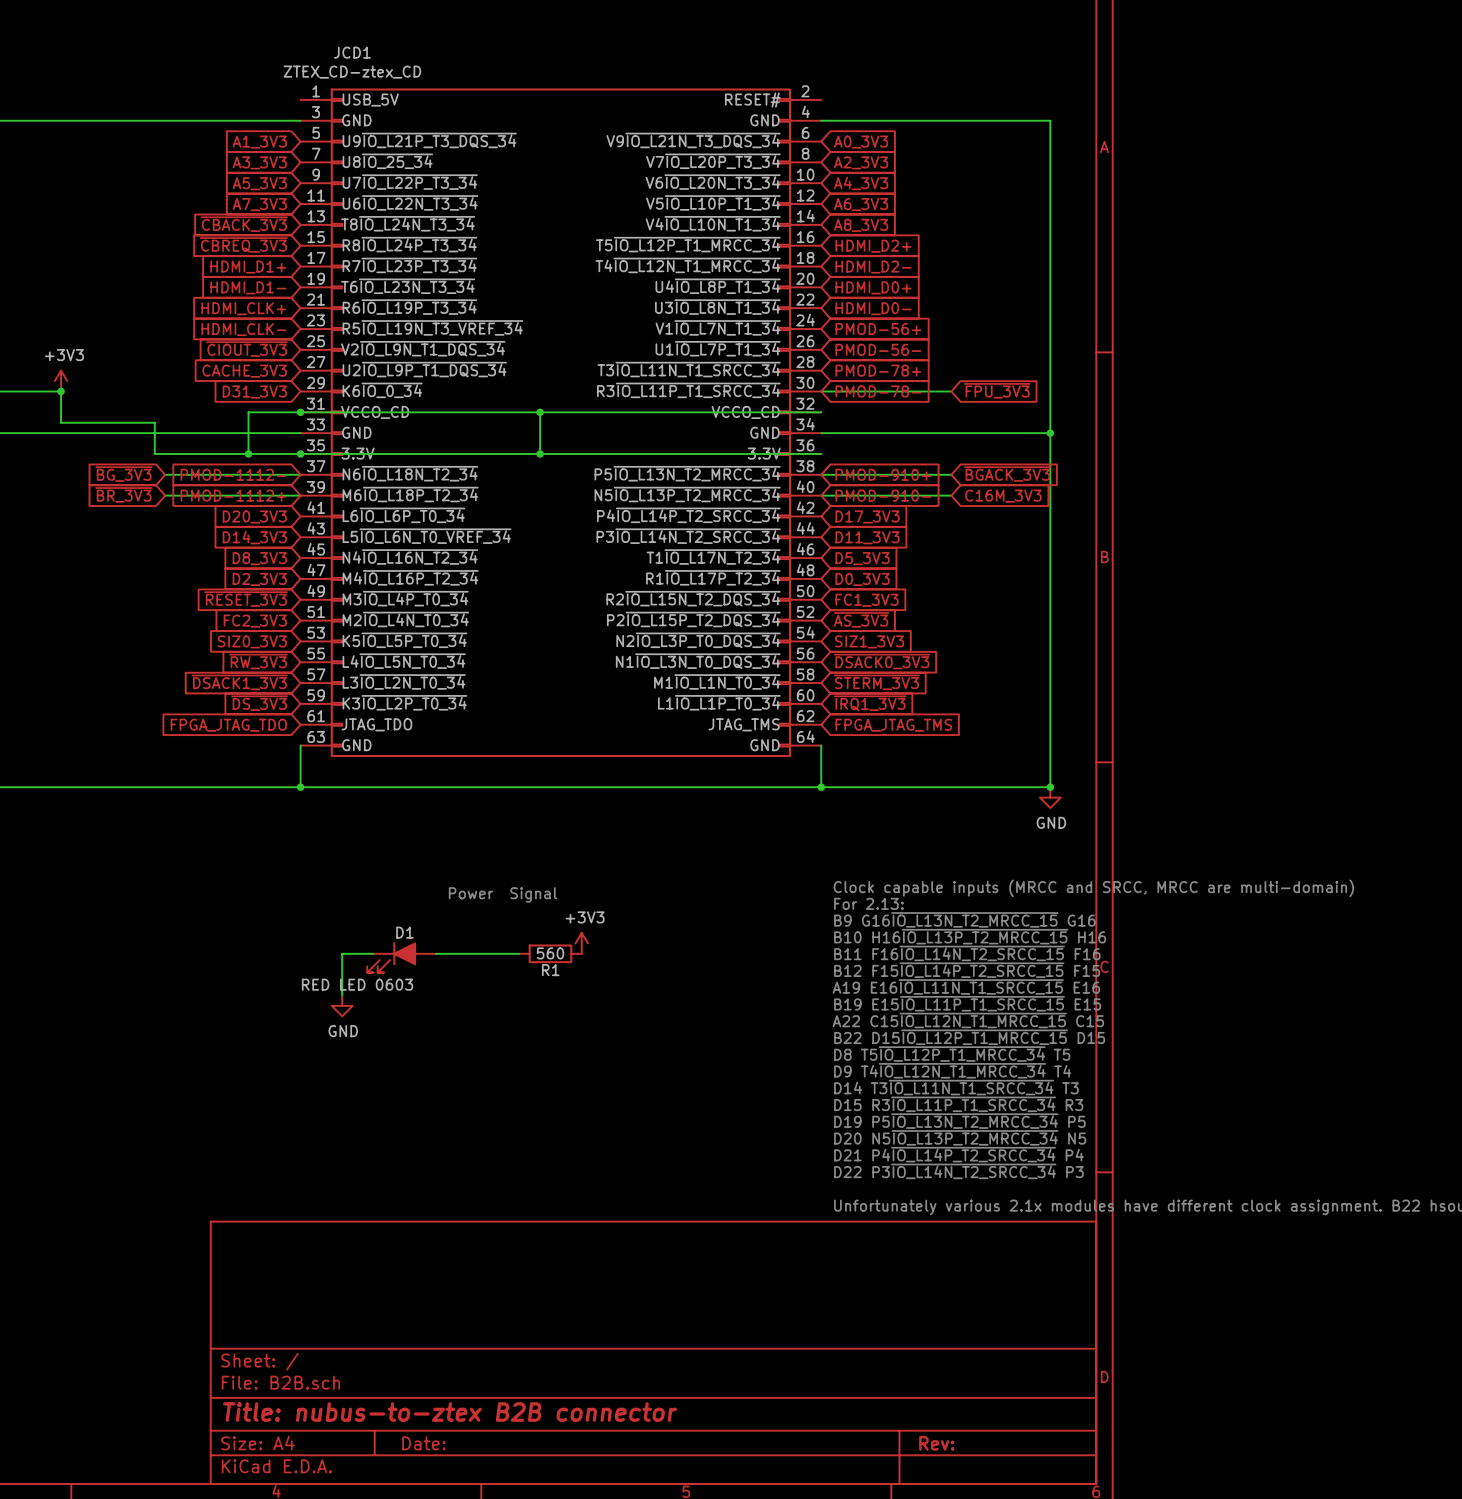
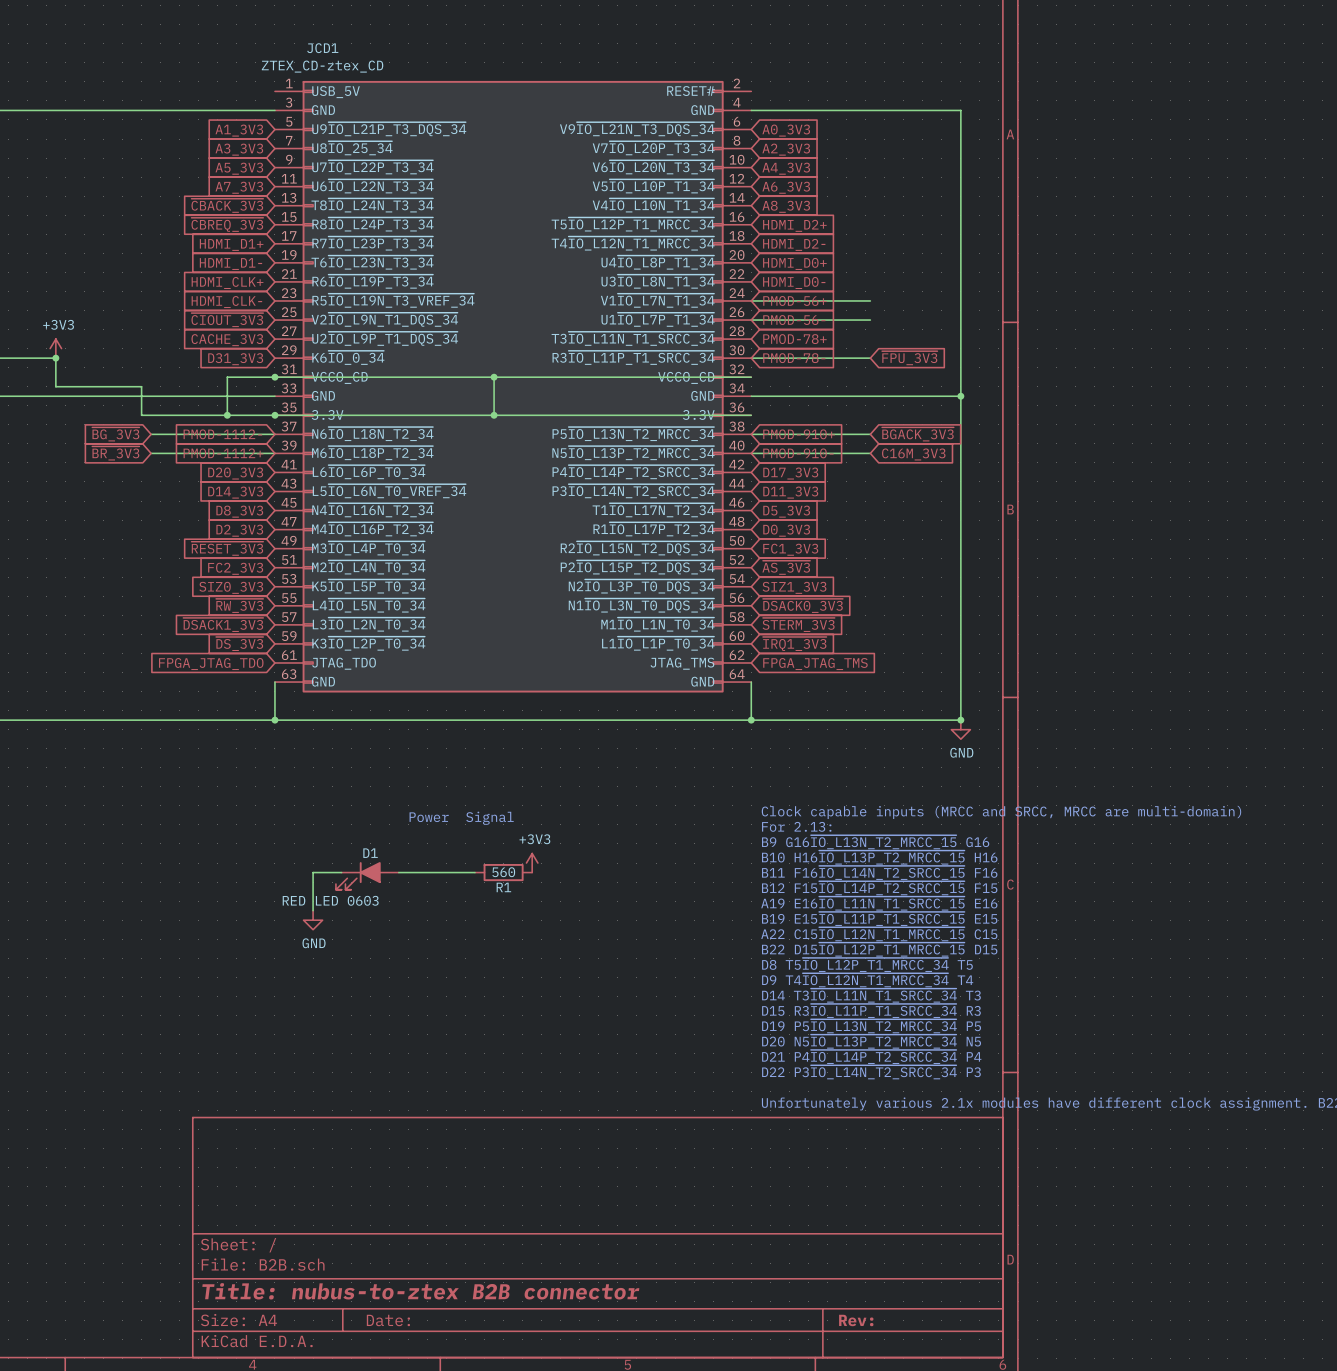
wire: none -> (751, 300) (870, 300)
wire: none -> (751, 320) (870, 320)

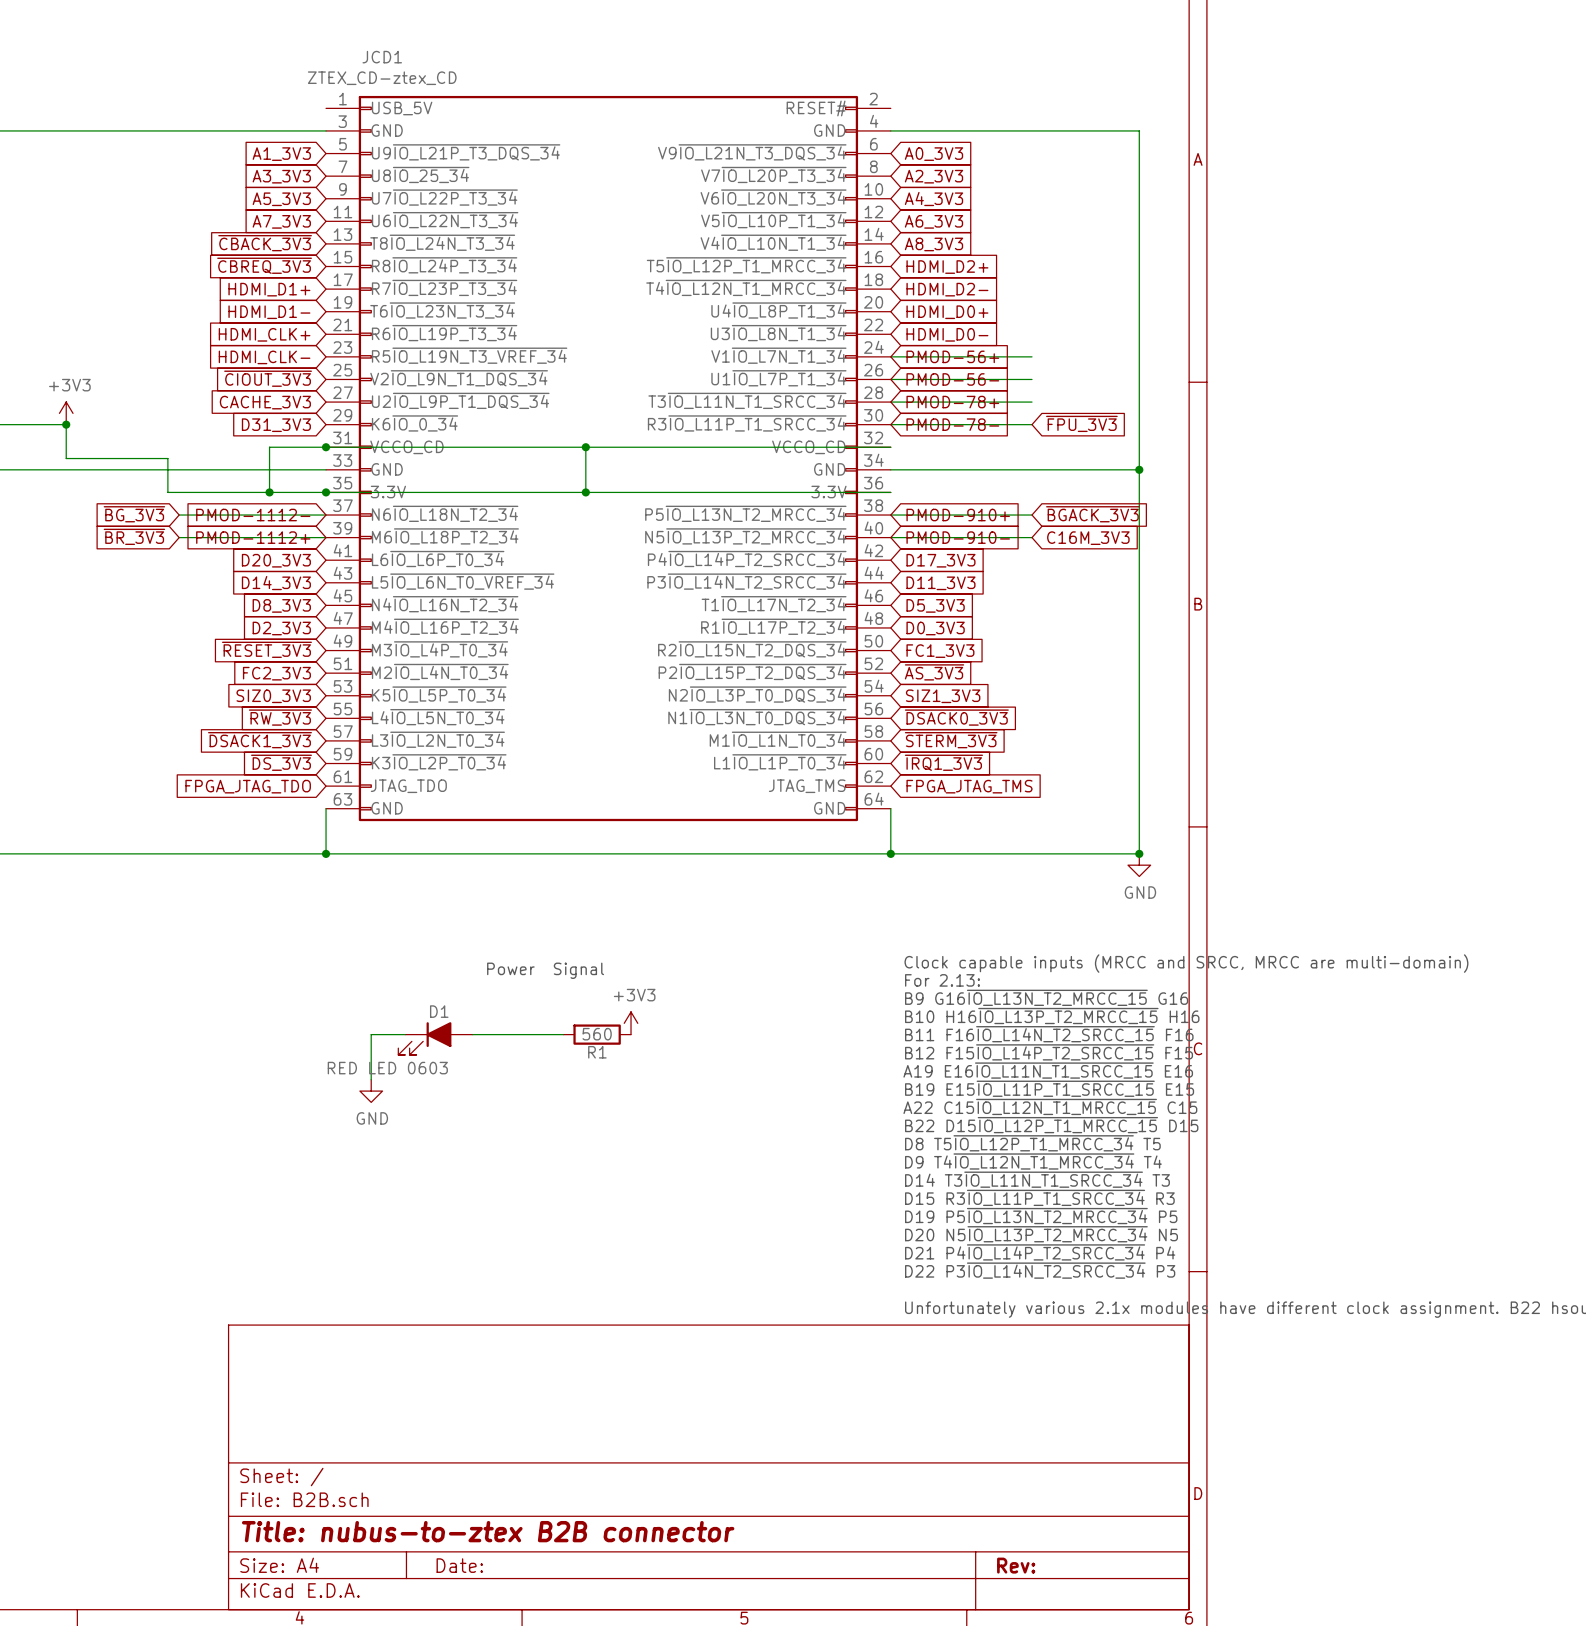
wire: none -> (890, 402) (1032, 402)

